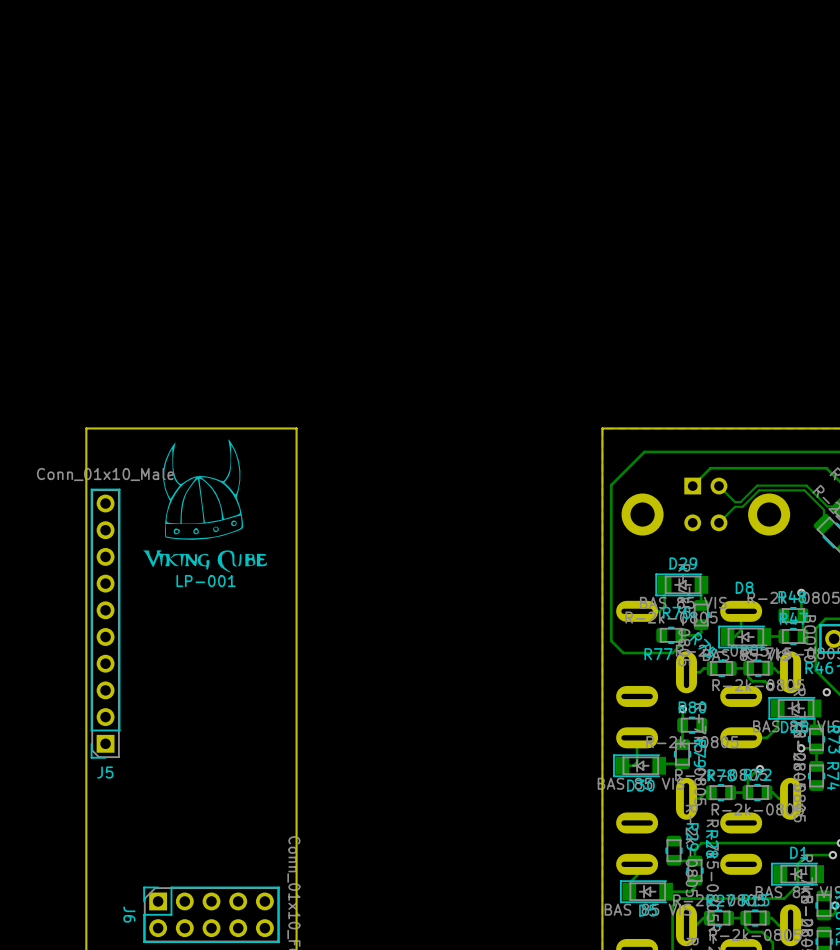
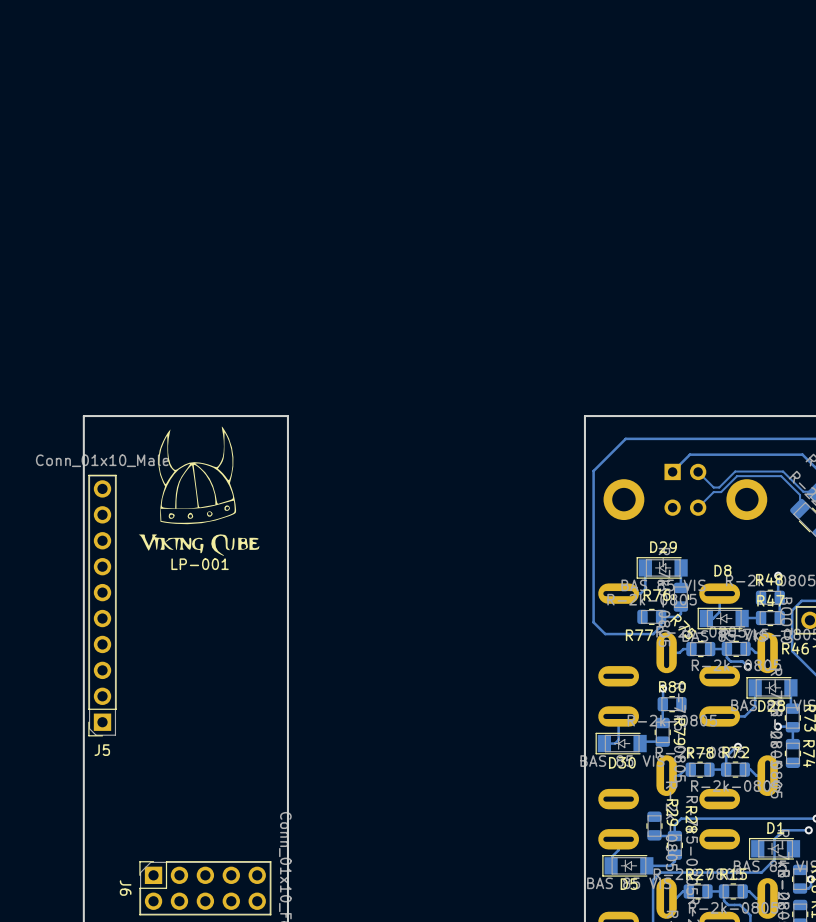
via: (826, 692) -> none

